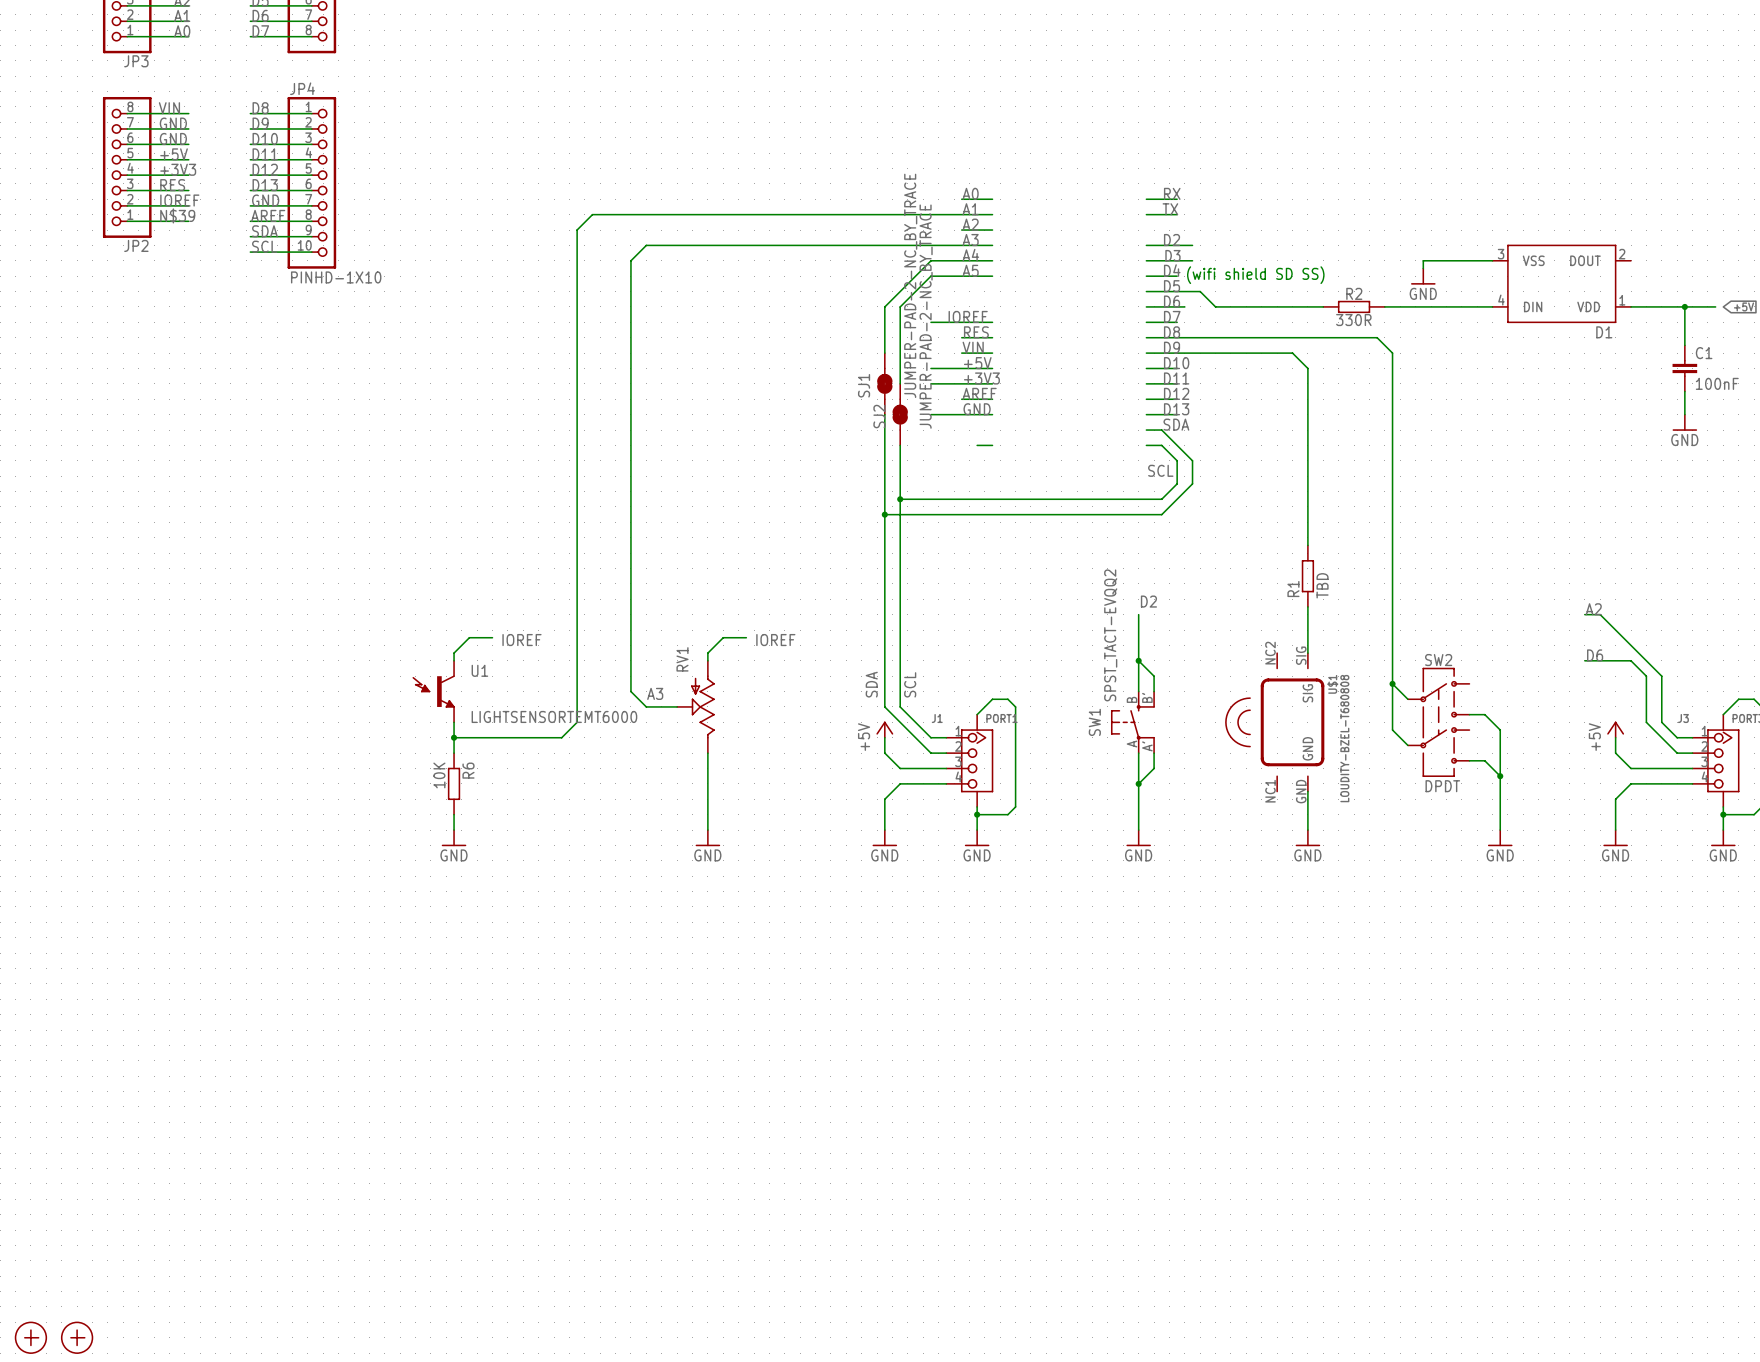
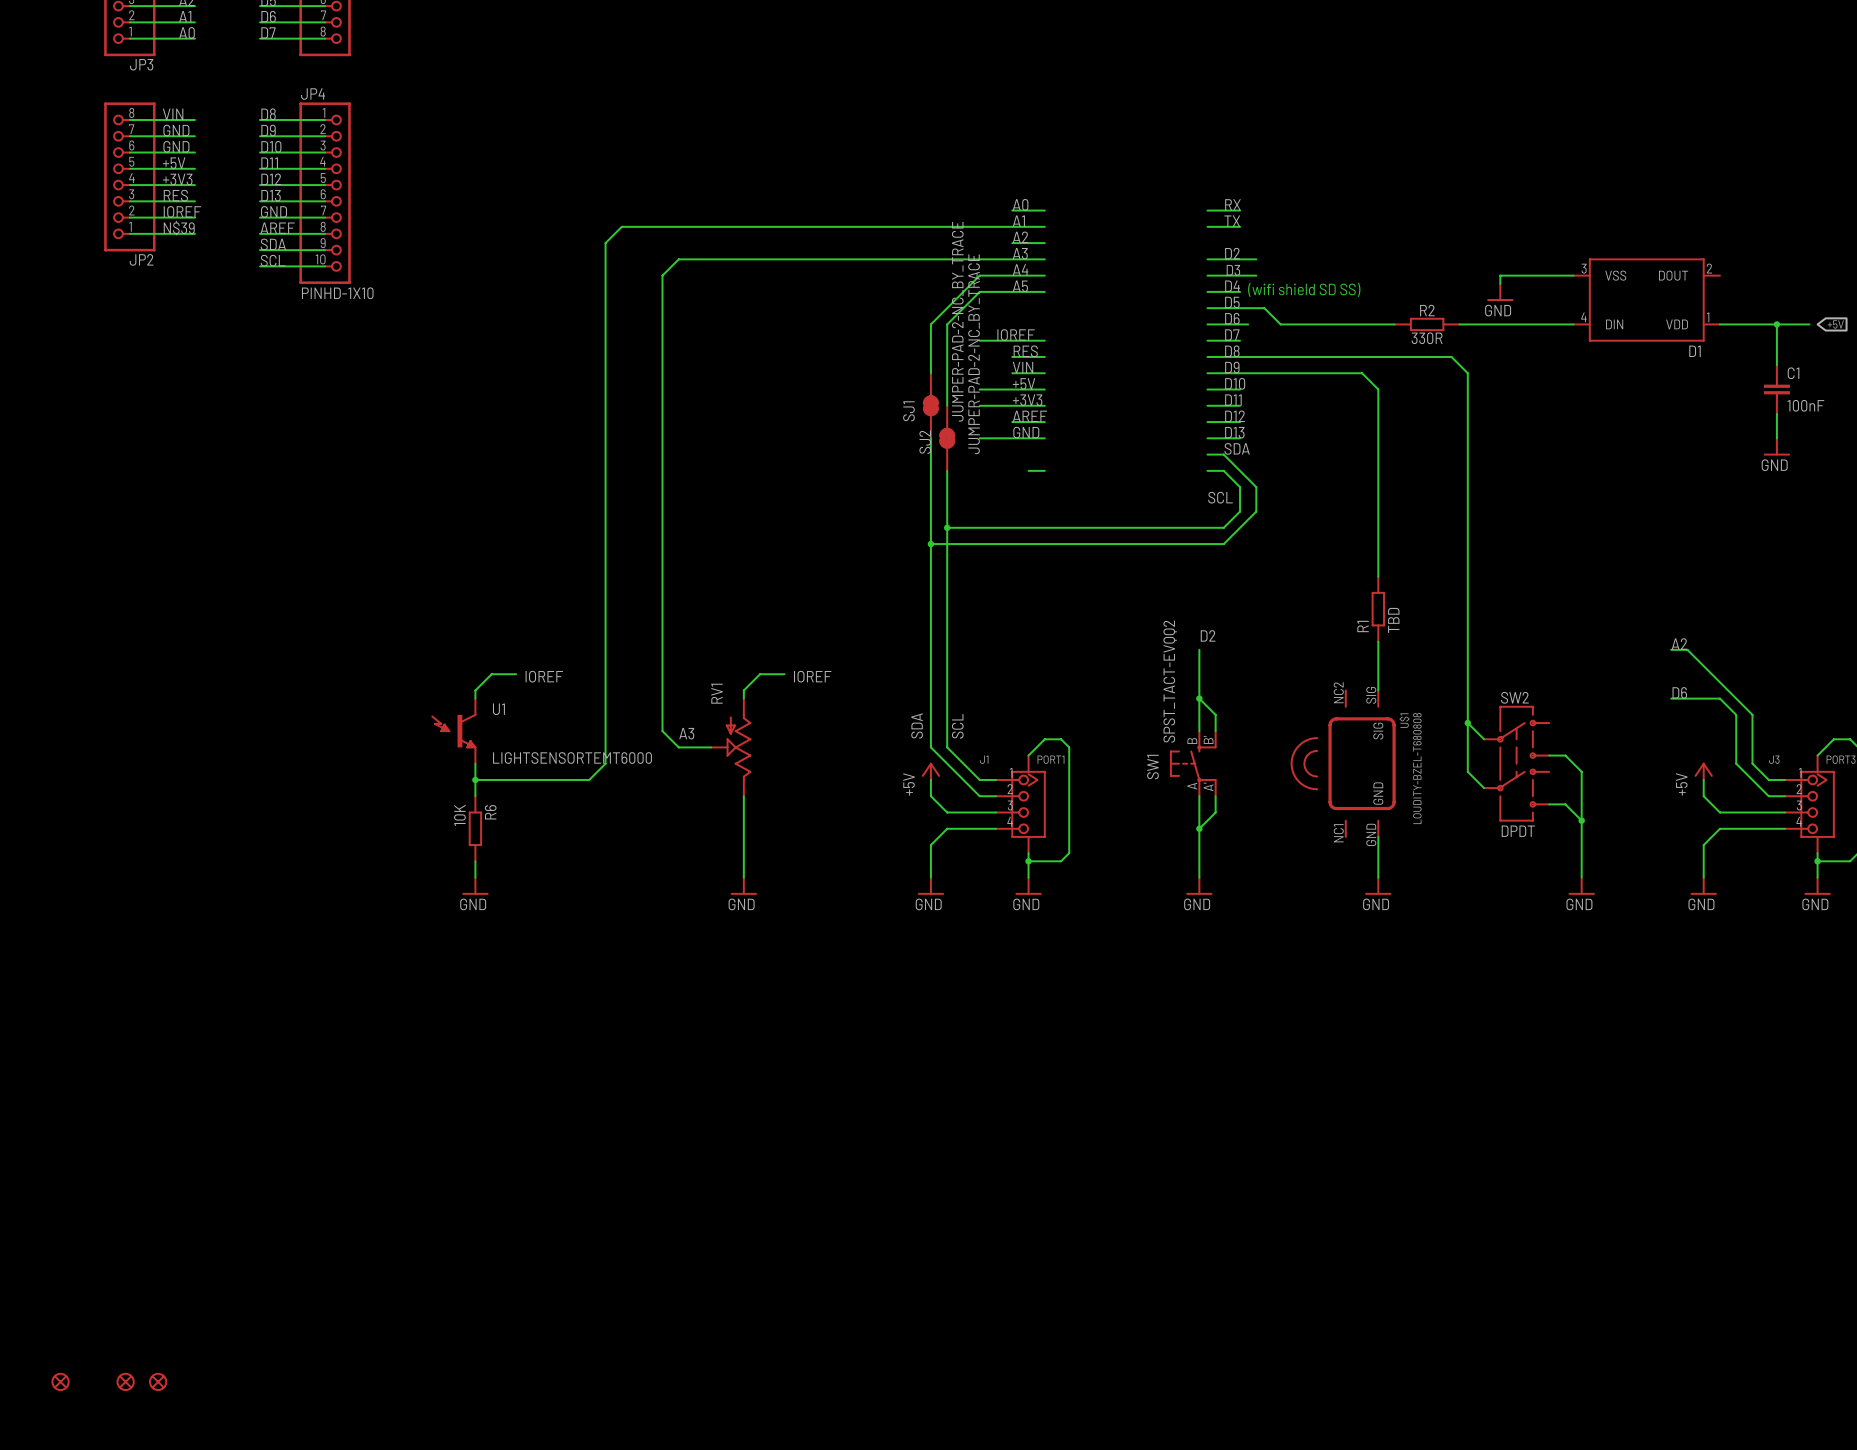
part: none -> (60, 1381)
part: none -> (125, 1381)
part: none -> (158, 1381)
part: (30, 1337) -> none
part: (77, 1337) -> none

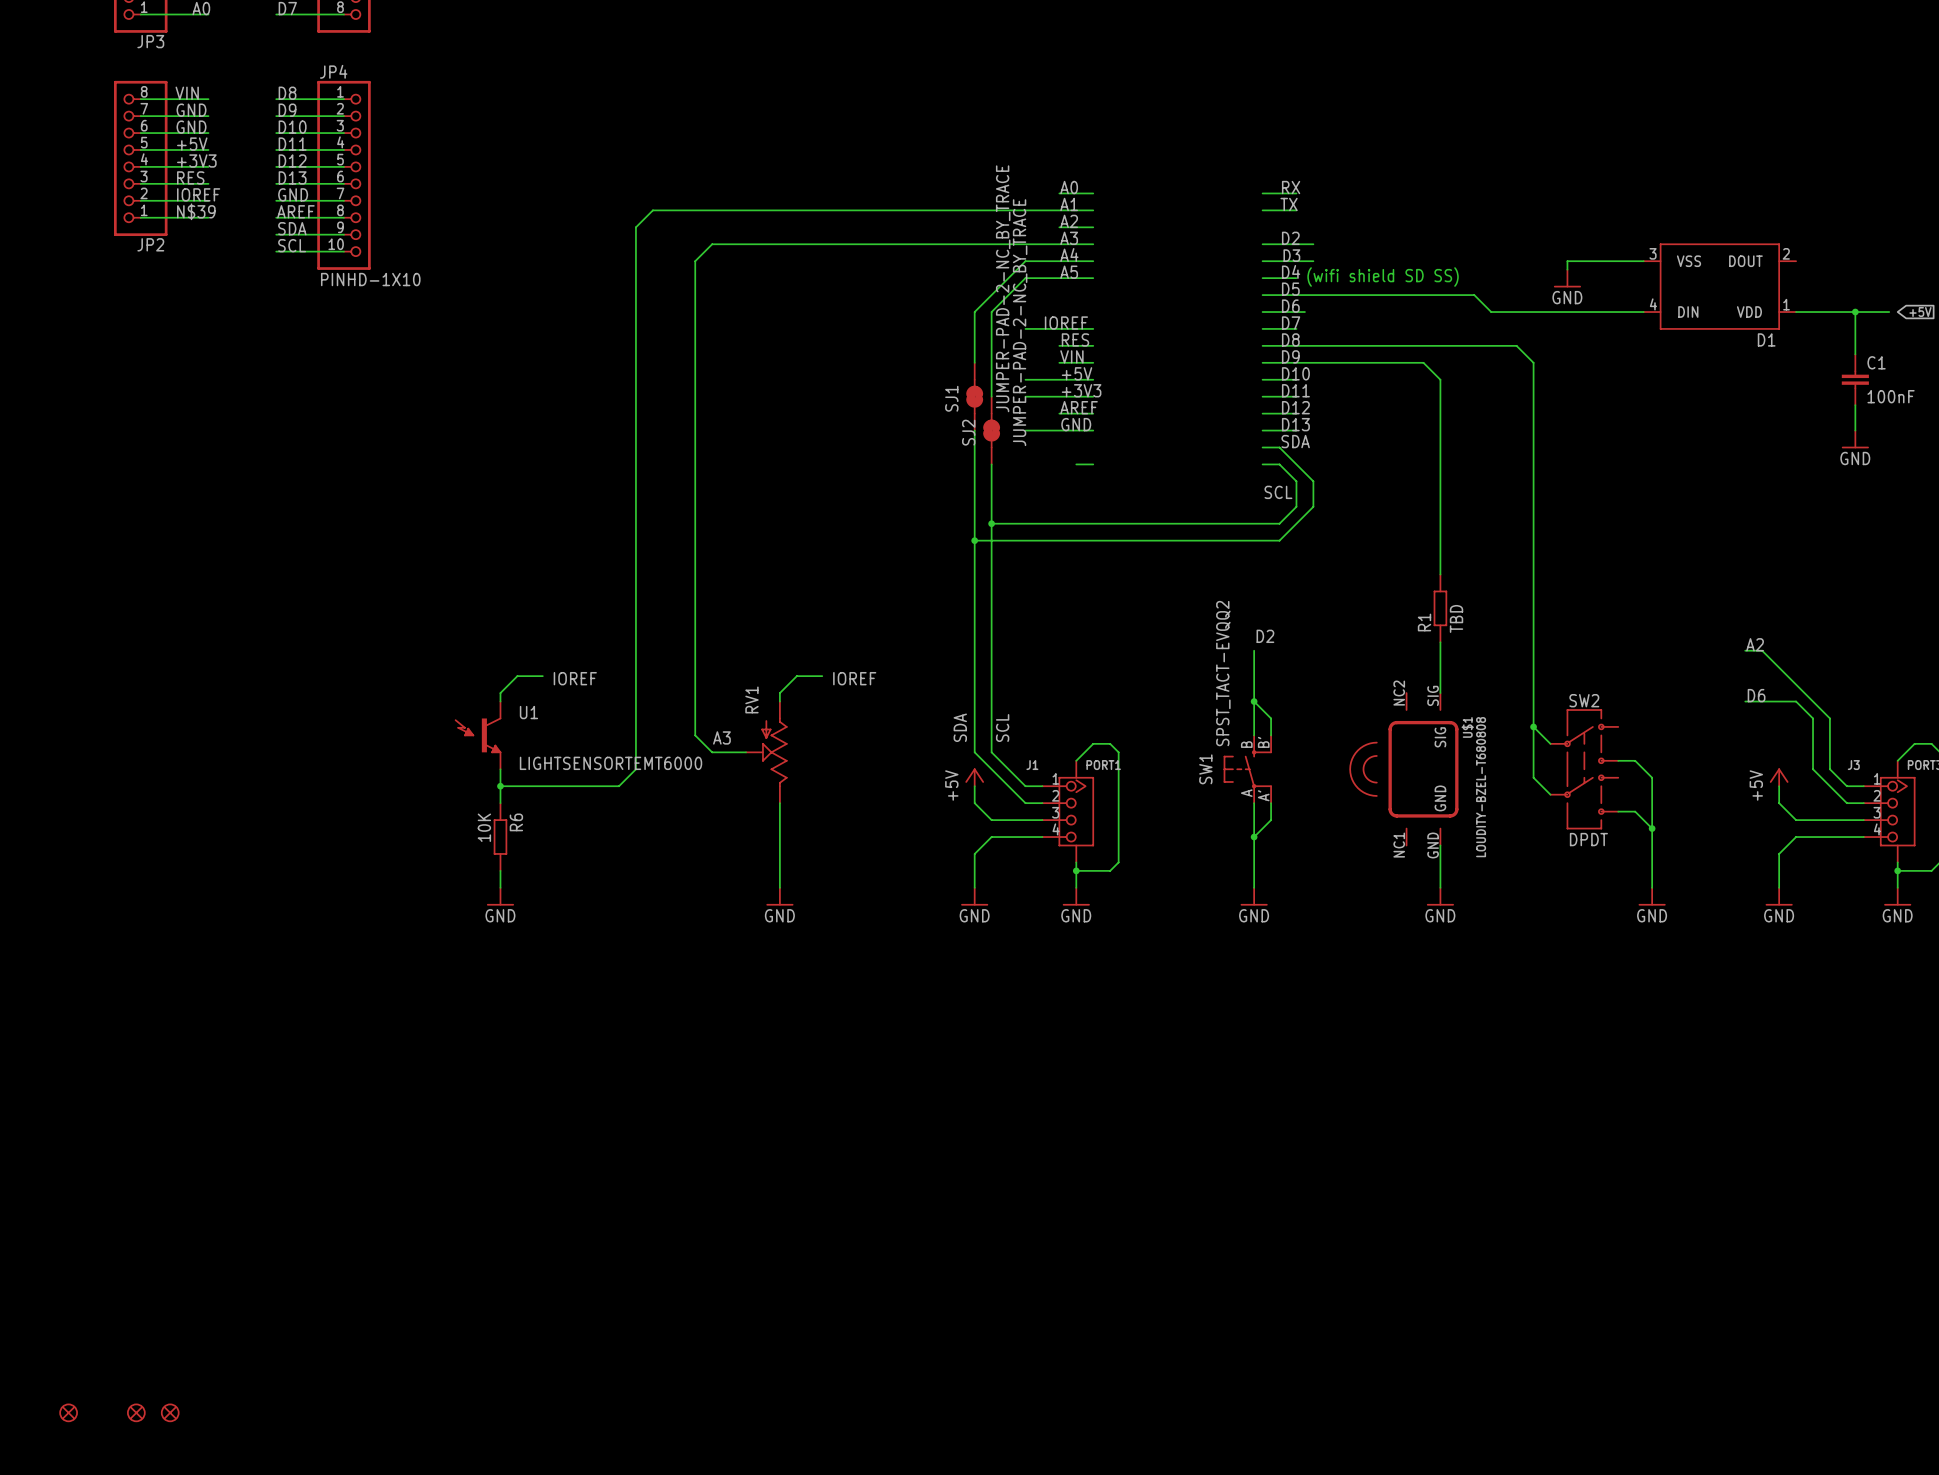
wire: (1264, 308) (1280, 324) (1394, 324) -> (1321, 295) (1474, 295) (1491, 312) (1525, 312)
R2: 330R (1427, 324) -> none

